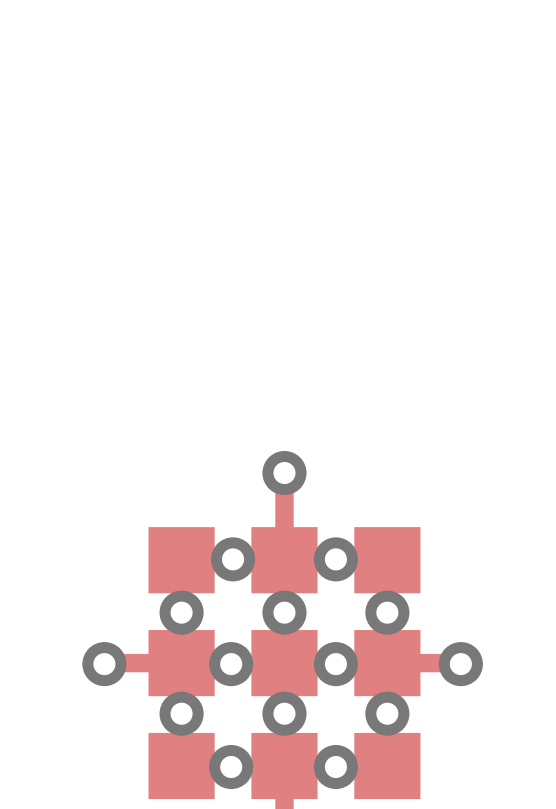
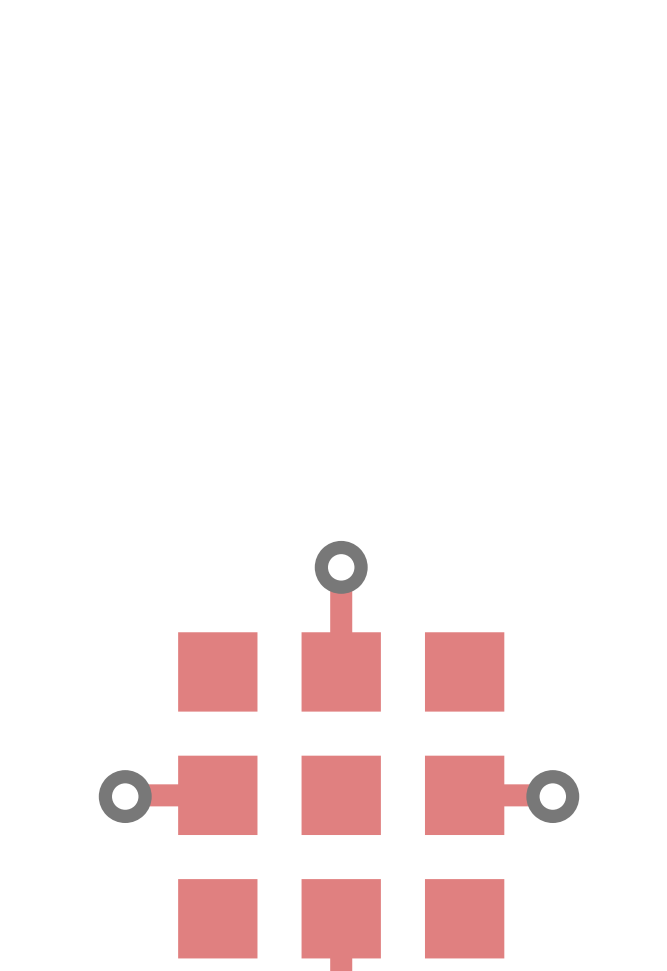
via: (233, 559) -> none
via: (335, 559) -> none
via: (181, 612) -> none
via: (284, 612) -> none
via: (387, 612) -> none
via: (231, 664) -> none
via: (335, 664) -> none
via: (181, 713) -> none
via: (284, 713) -> none
via: (387, 713) -> none
via: (231, 767) -> none
via: (335, 767) -> none

